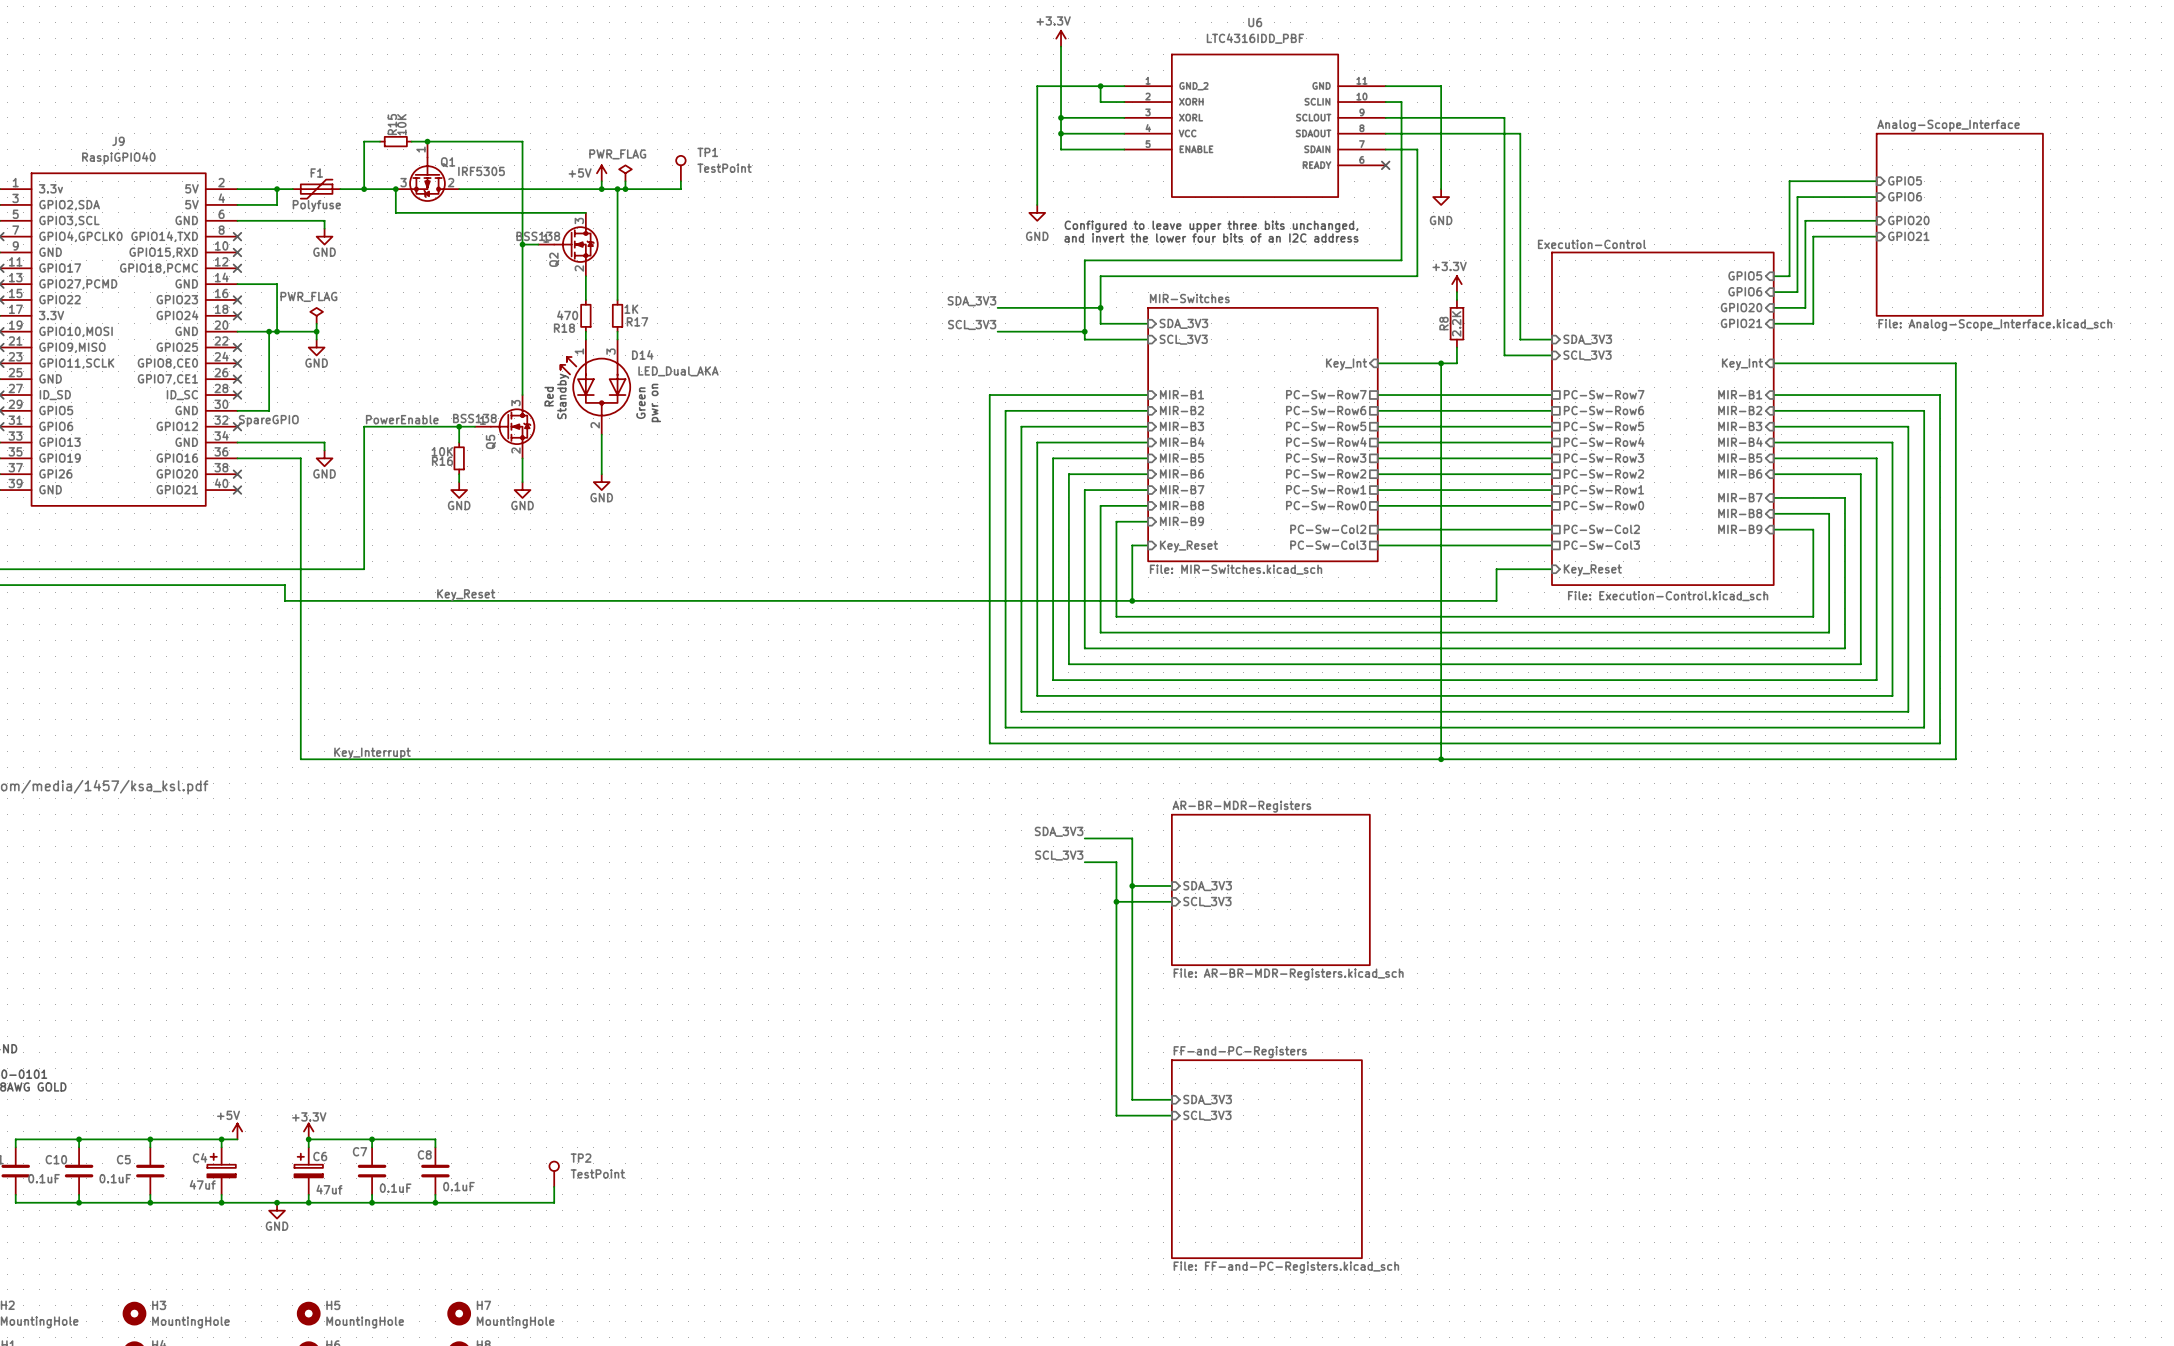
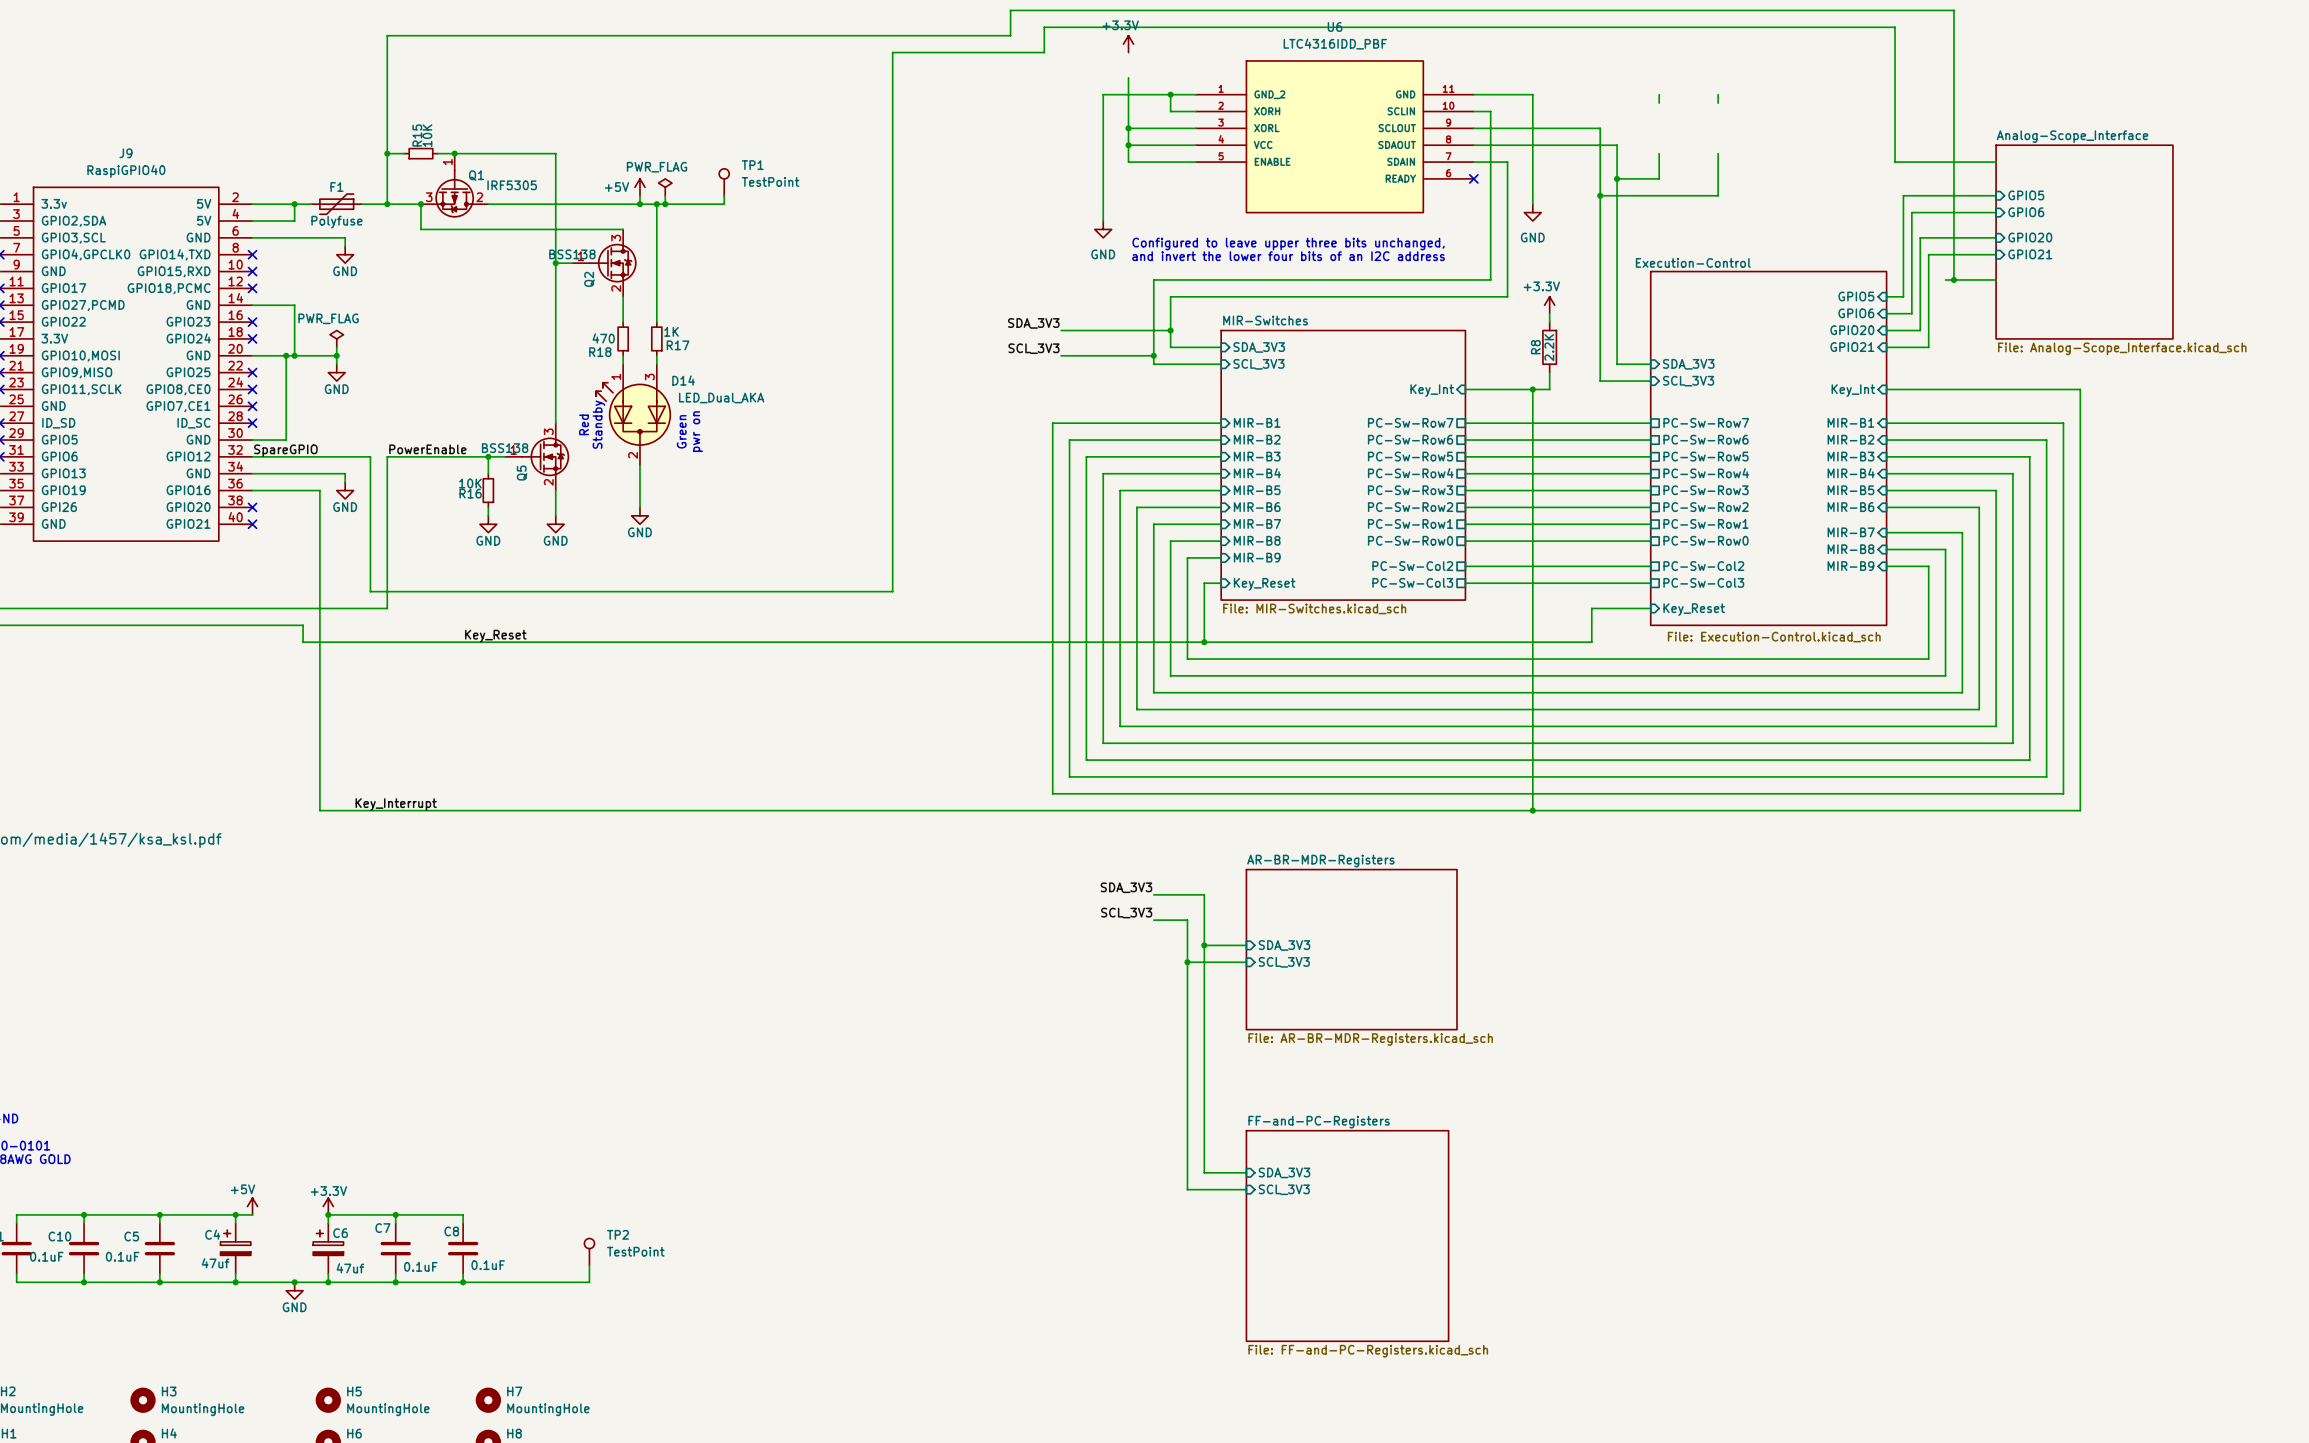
wire: (1061, 46) (1061, 70) -> none
wire: none -> (1659, 94) (1659, 103)
wire: none -> (1718, 94) (1718, 103)
wire: none -> (387, 153) (387, 35) (1010, 35) (1010, 10) (1953, 10) (1953, 279)
junction: none -> (387, 153)
wire: none -> (1659, 153) (1659, 178) (1617, 178)
wire: none -> (1718, 153) (1718, 195) (1600, 195)
wire: none -> (1996, 162) (1895, 162) (1895, 27) (1044, 27) (1044, 52) (892, 52) (892, 591) (370, 591) (370, 456) (252, 456)
junction: none -> (1617, 178)
junction: none -> (1600, 195)
wire: none -> (1945, 279) (1996, 279)
junction: none -> (1953, 279)
no-connect mark: (237, 426) -> none

